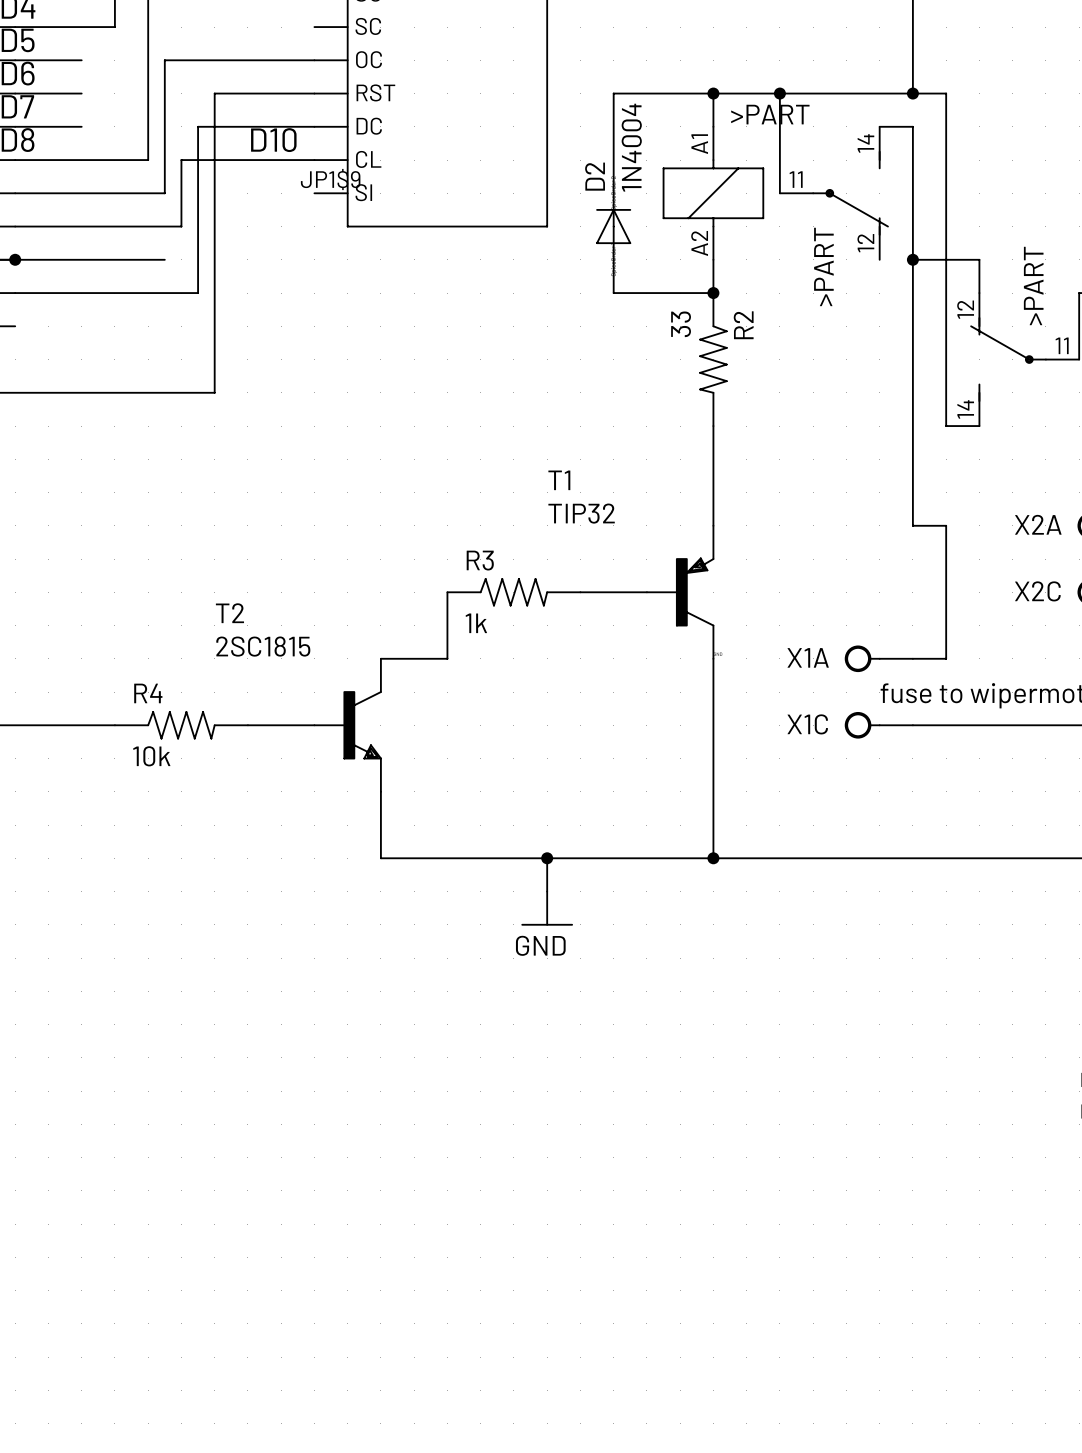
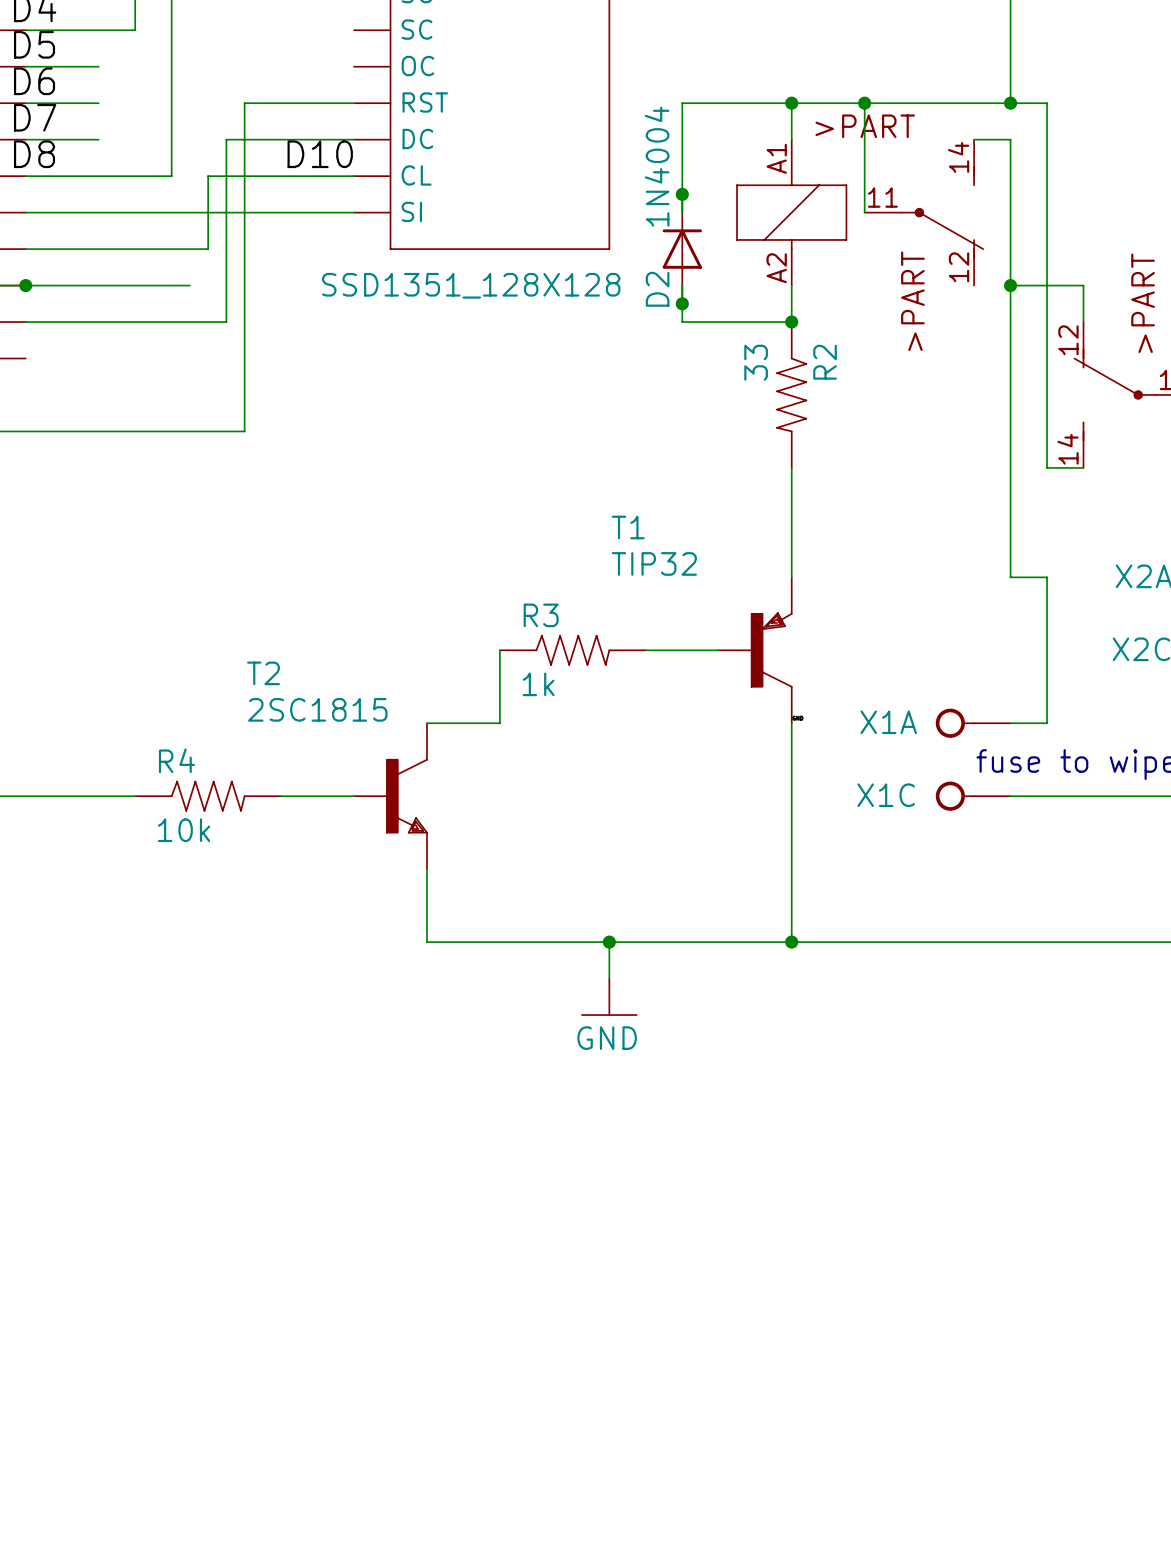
wire: (314, 60) (164, 60) (164, 193) -> (354, 212) (189, 212)
D2 value position: 1N4004 (631, 147) -> 1N4004 (657, 166)
D2 name position: D2 (595, 176) -> D2 (657, 289)
junction: none -> (682, 194)
part pin number: JP1$9 (330, 179) -> none
D2 symbol: [597, 193, 631, 260] -> [662, 194, 702, 304]
part value: none -> SSD1351_128X128 (471, 285)
junction: none -> (682, 303)

